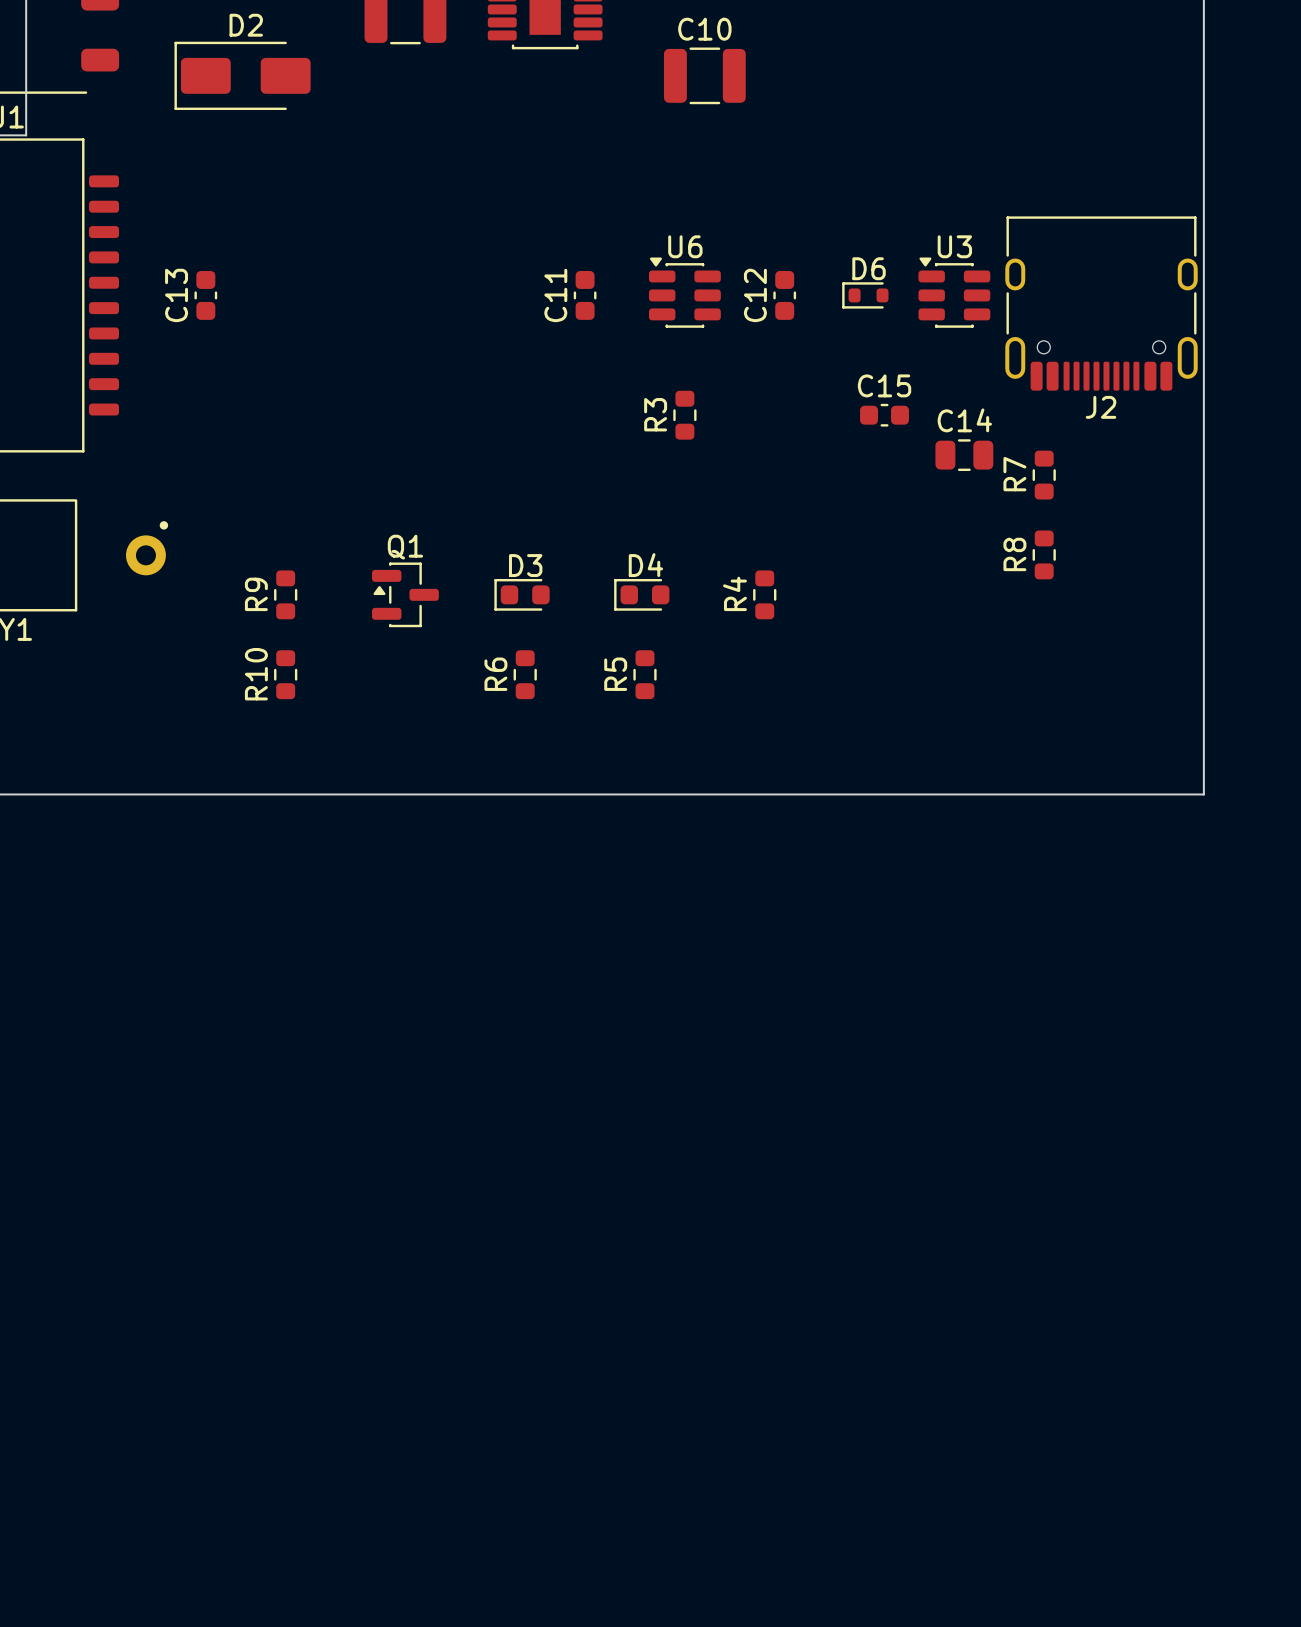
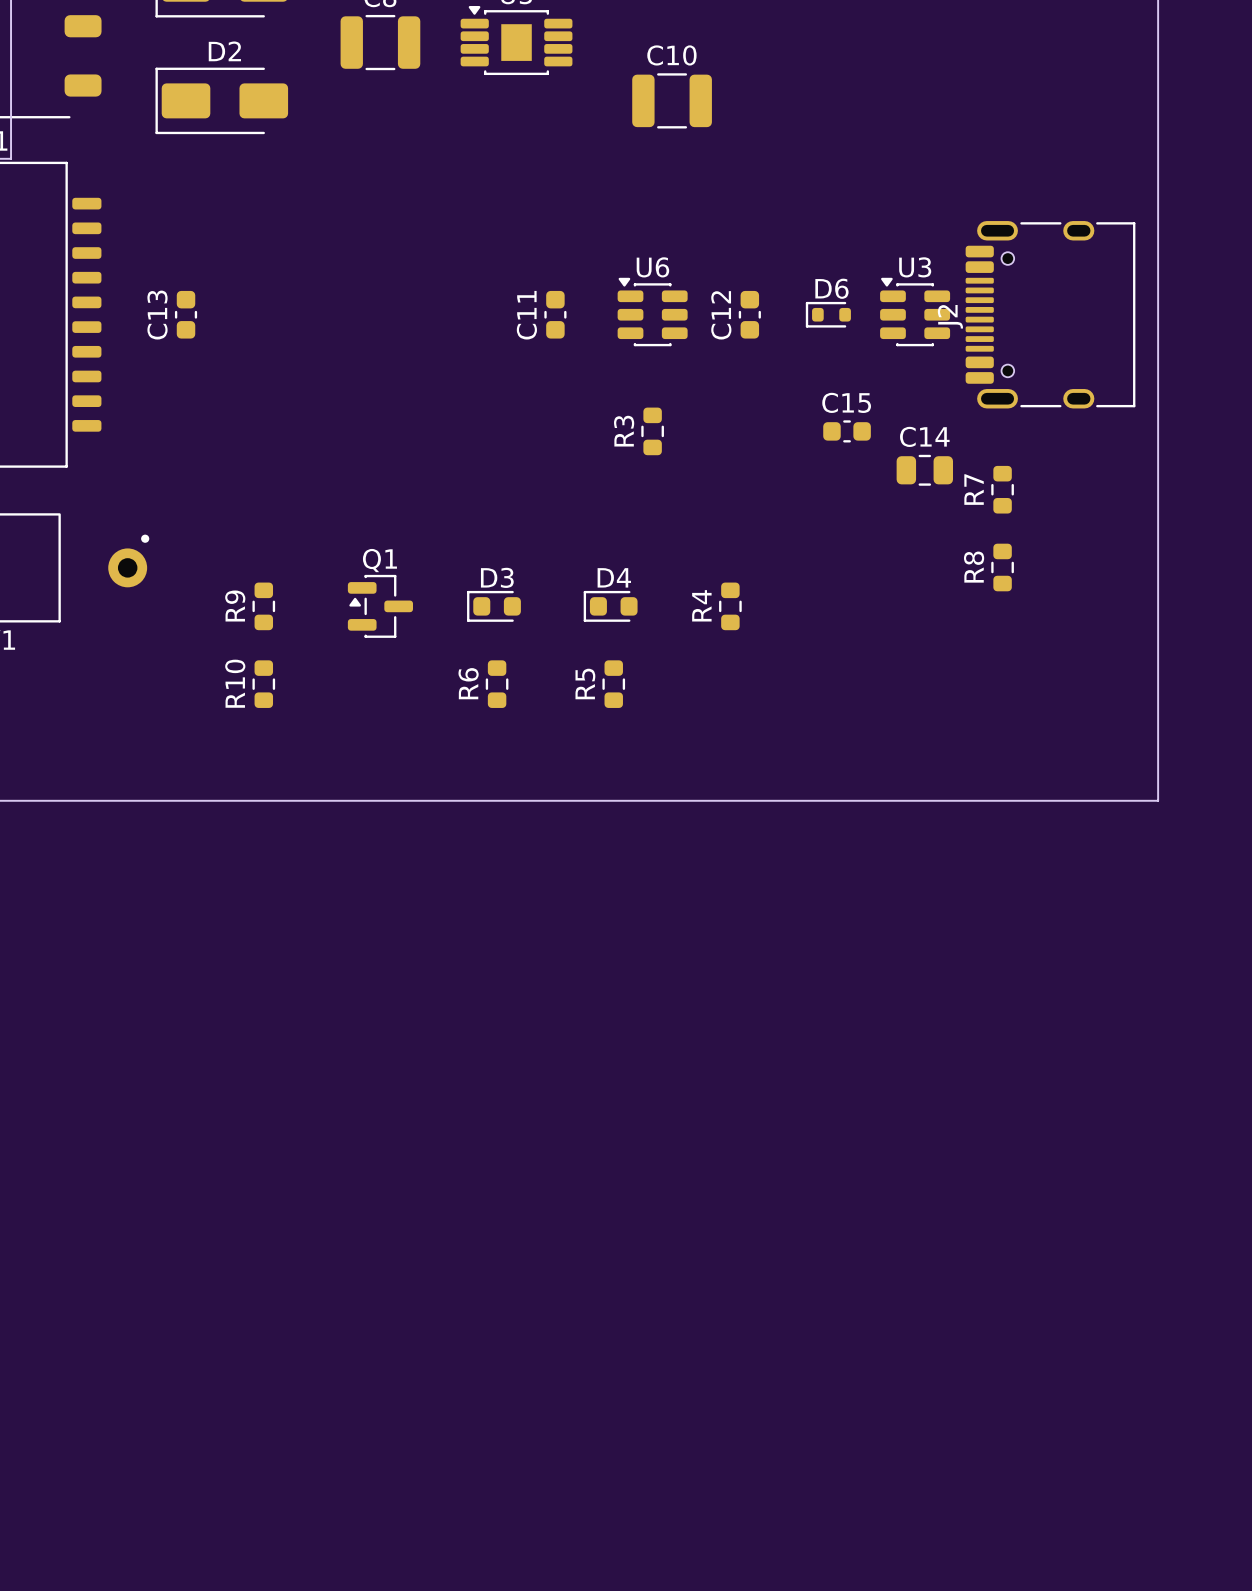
J2 rotation: 0° (1101, 303) -> 90° clockwise (1050, 314)

